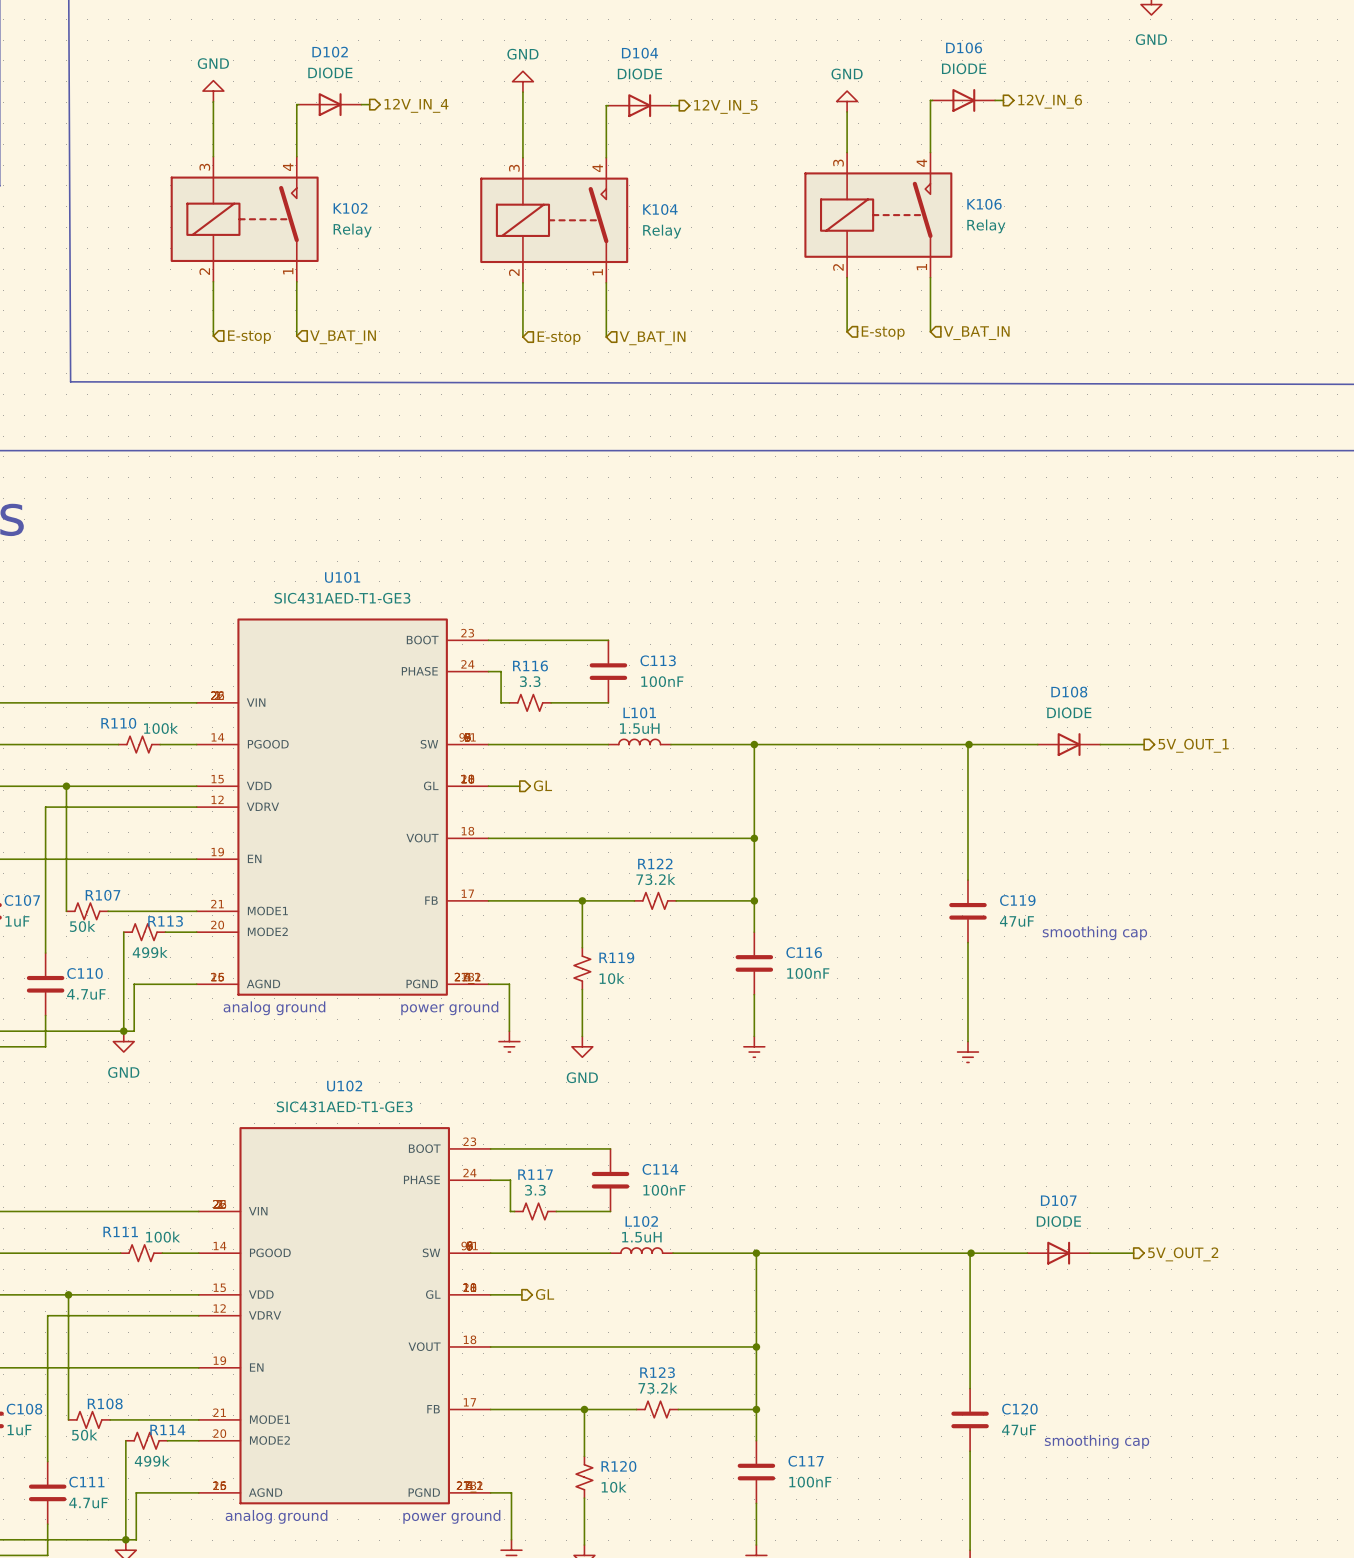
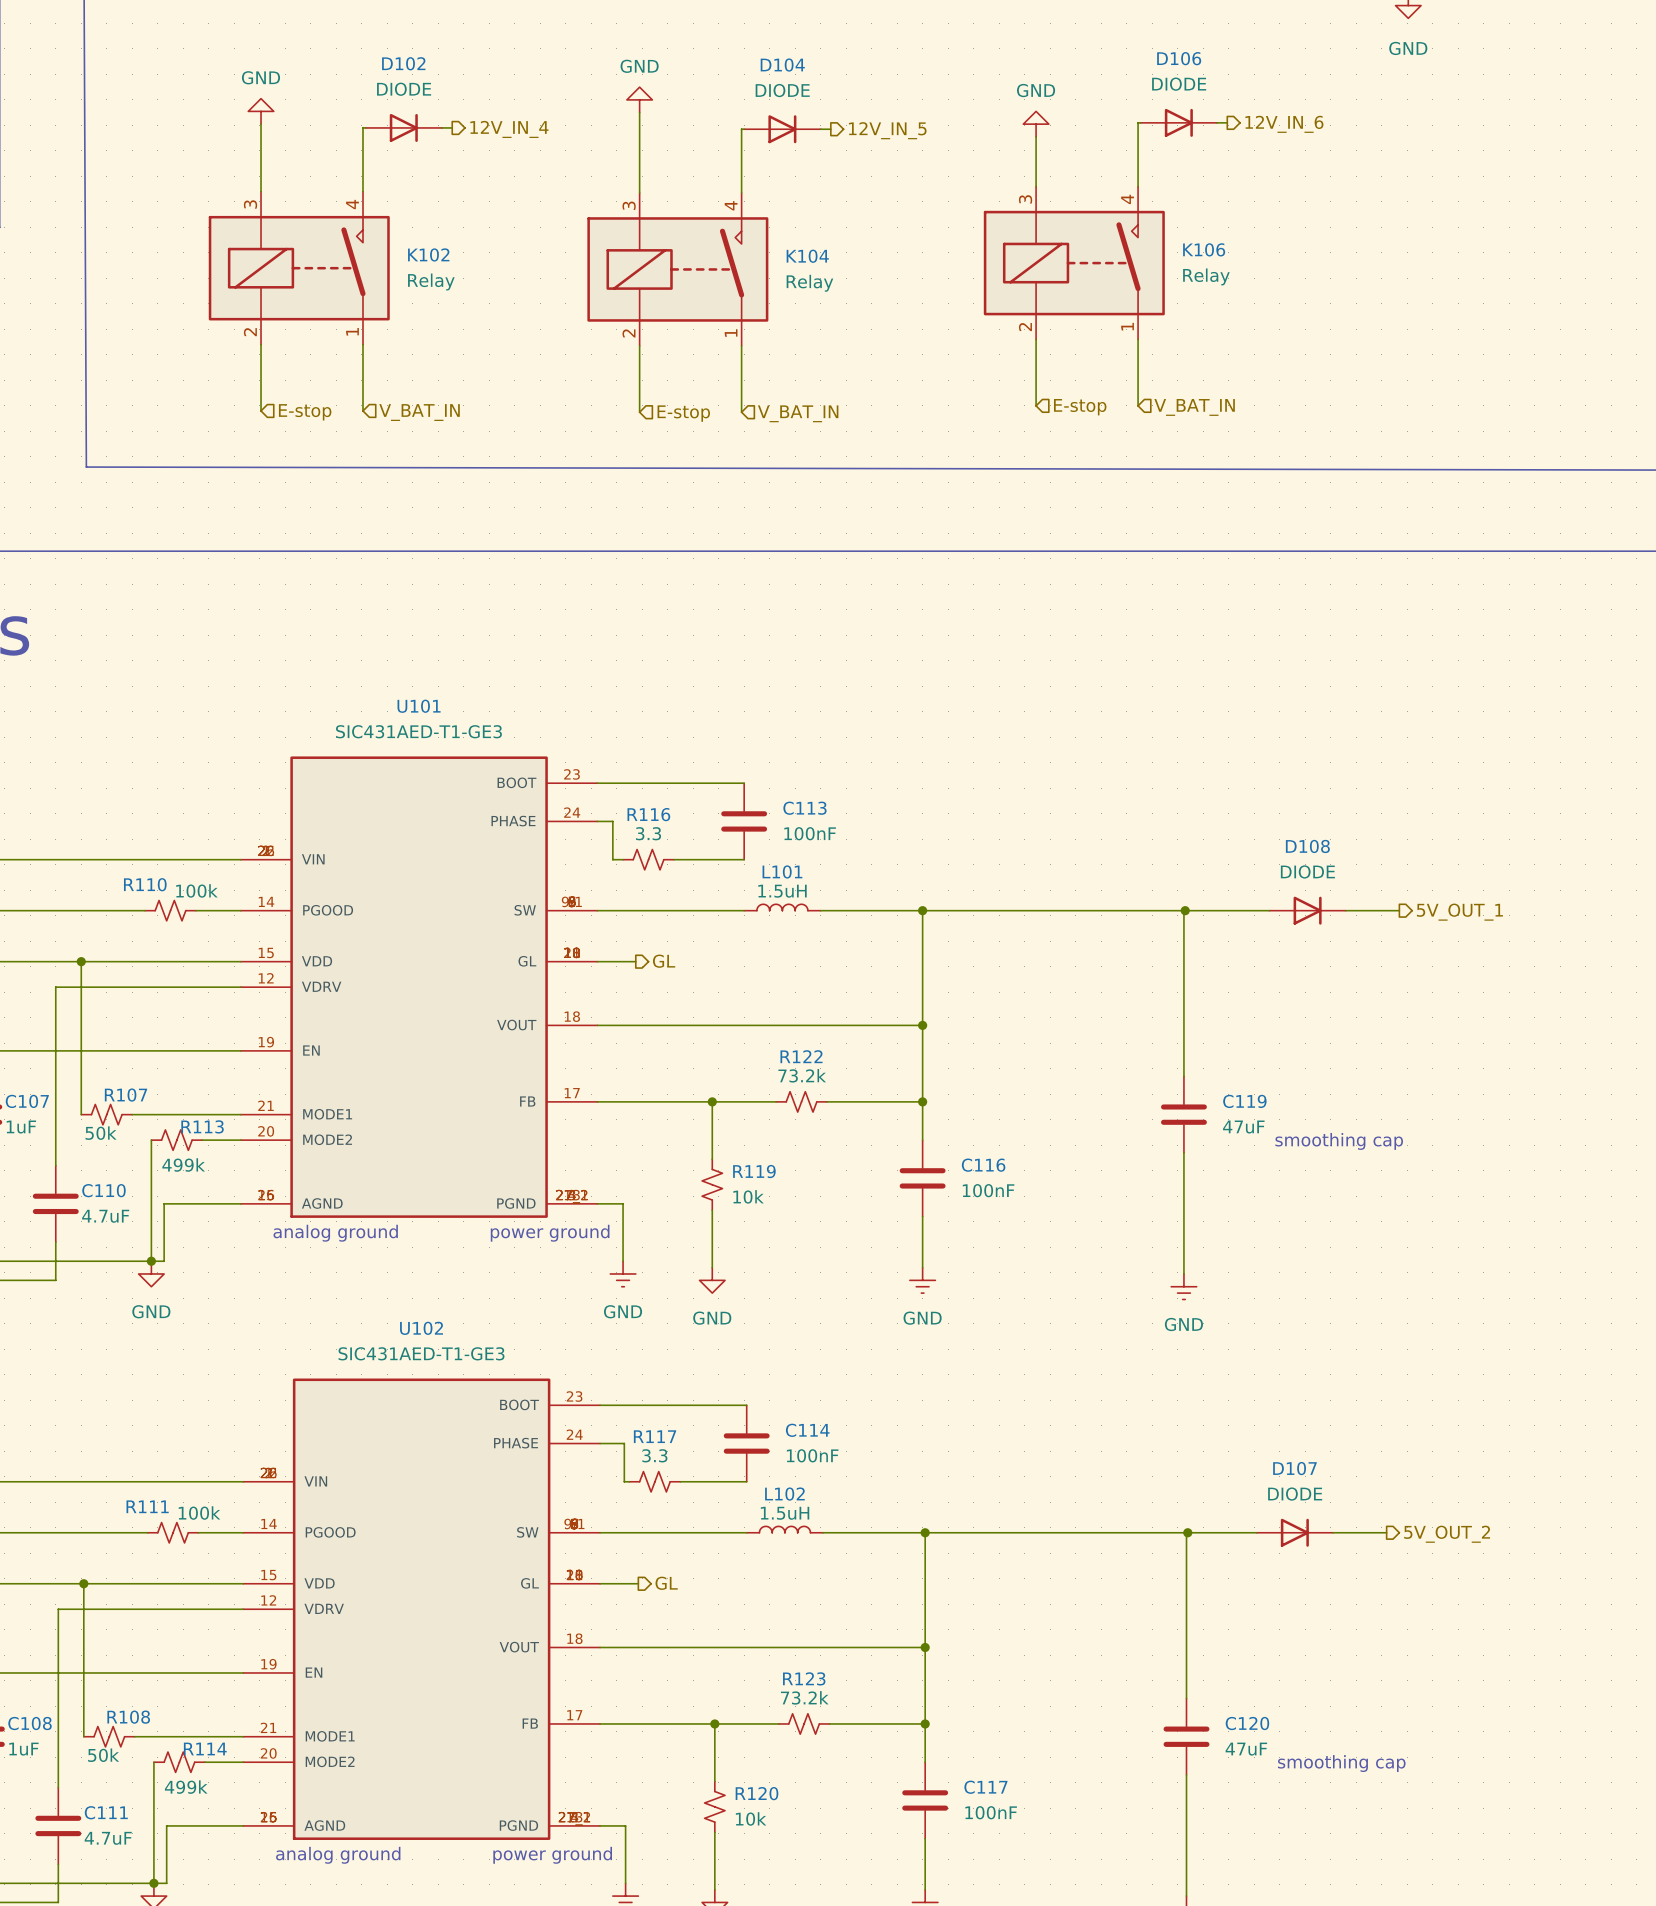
power symbol text: none -> GND (623, 1311)
power symbol text: none -> GND (922, 1318)
power symbol text: none -> GND (1183, 1324)

